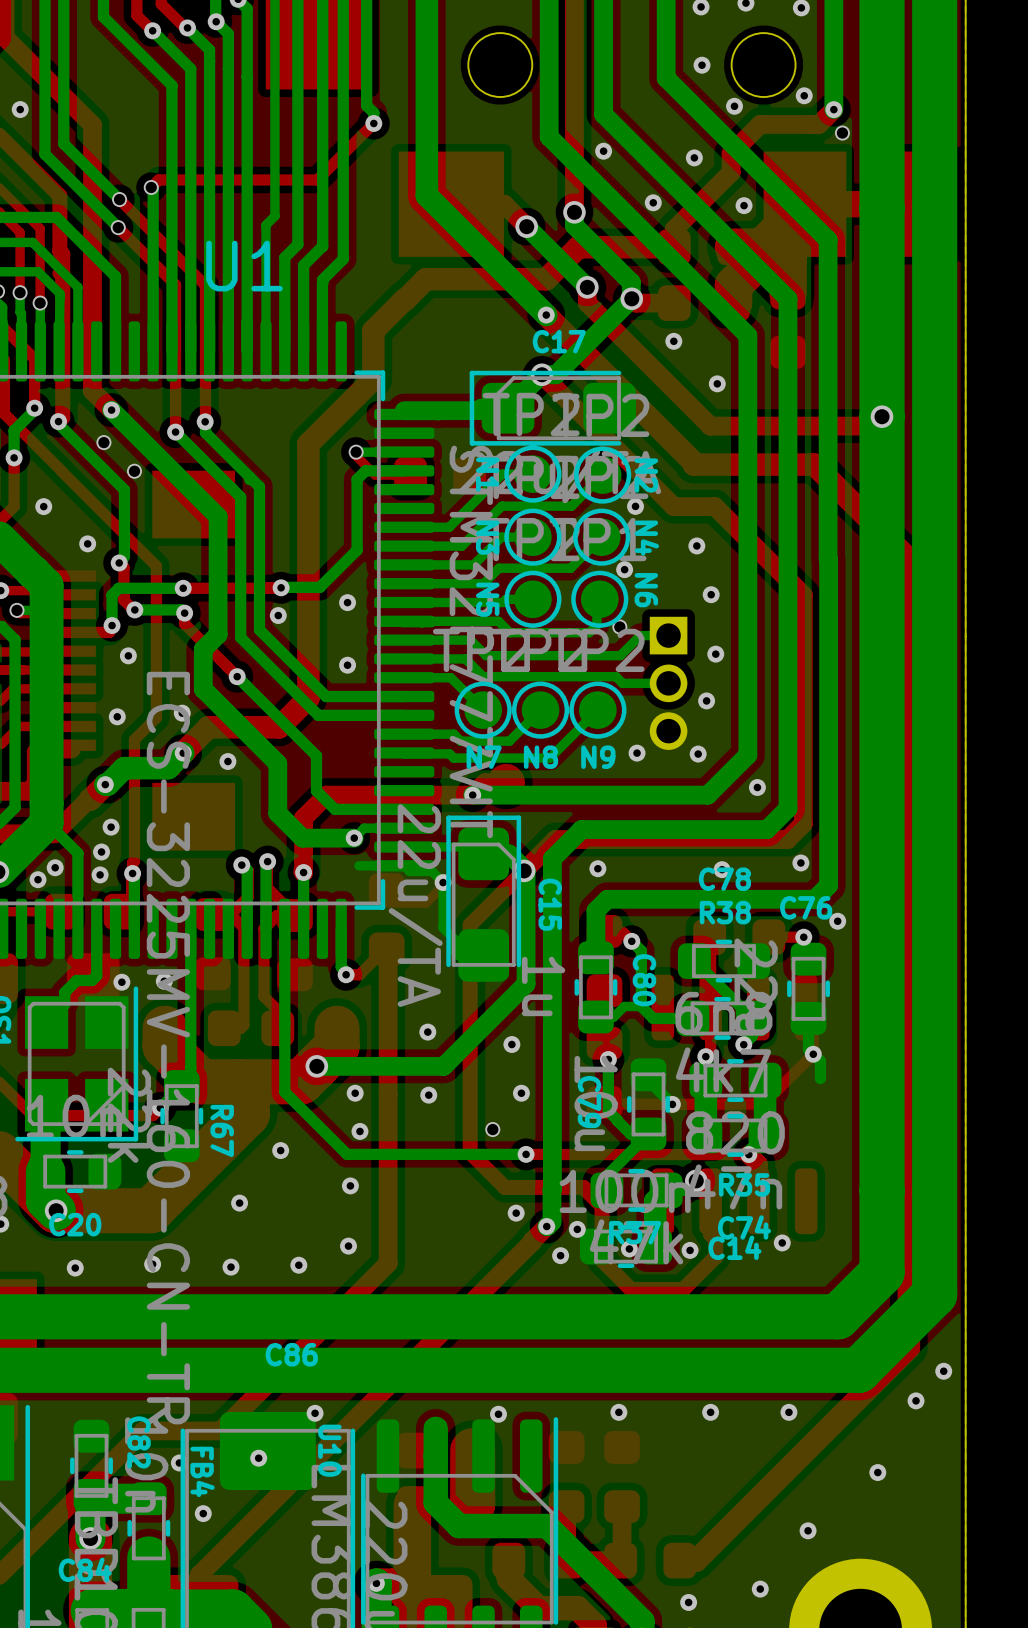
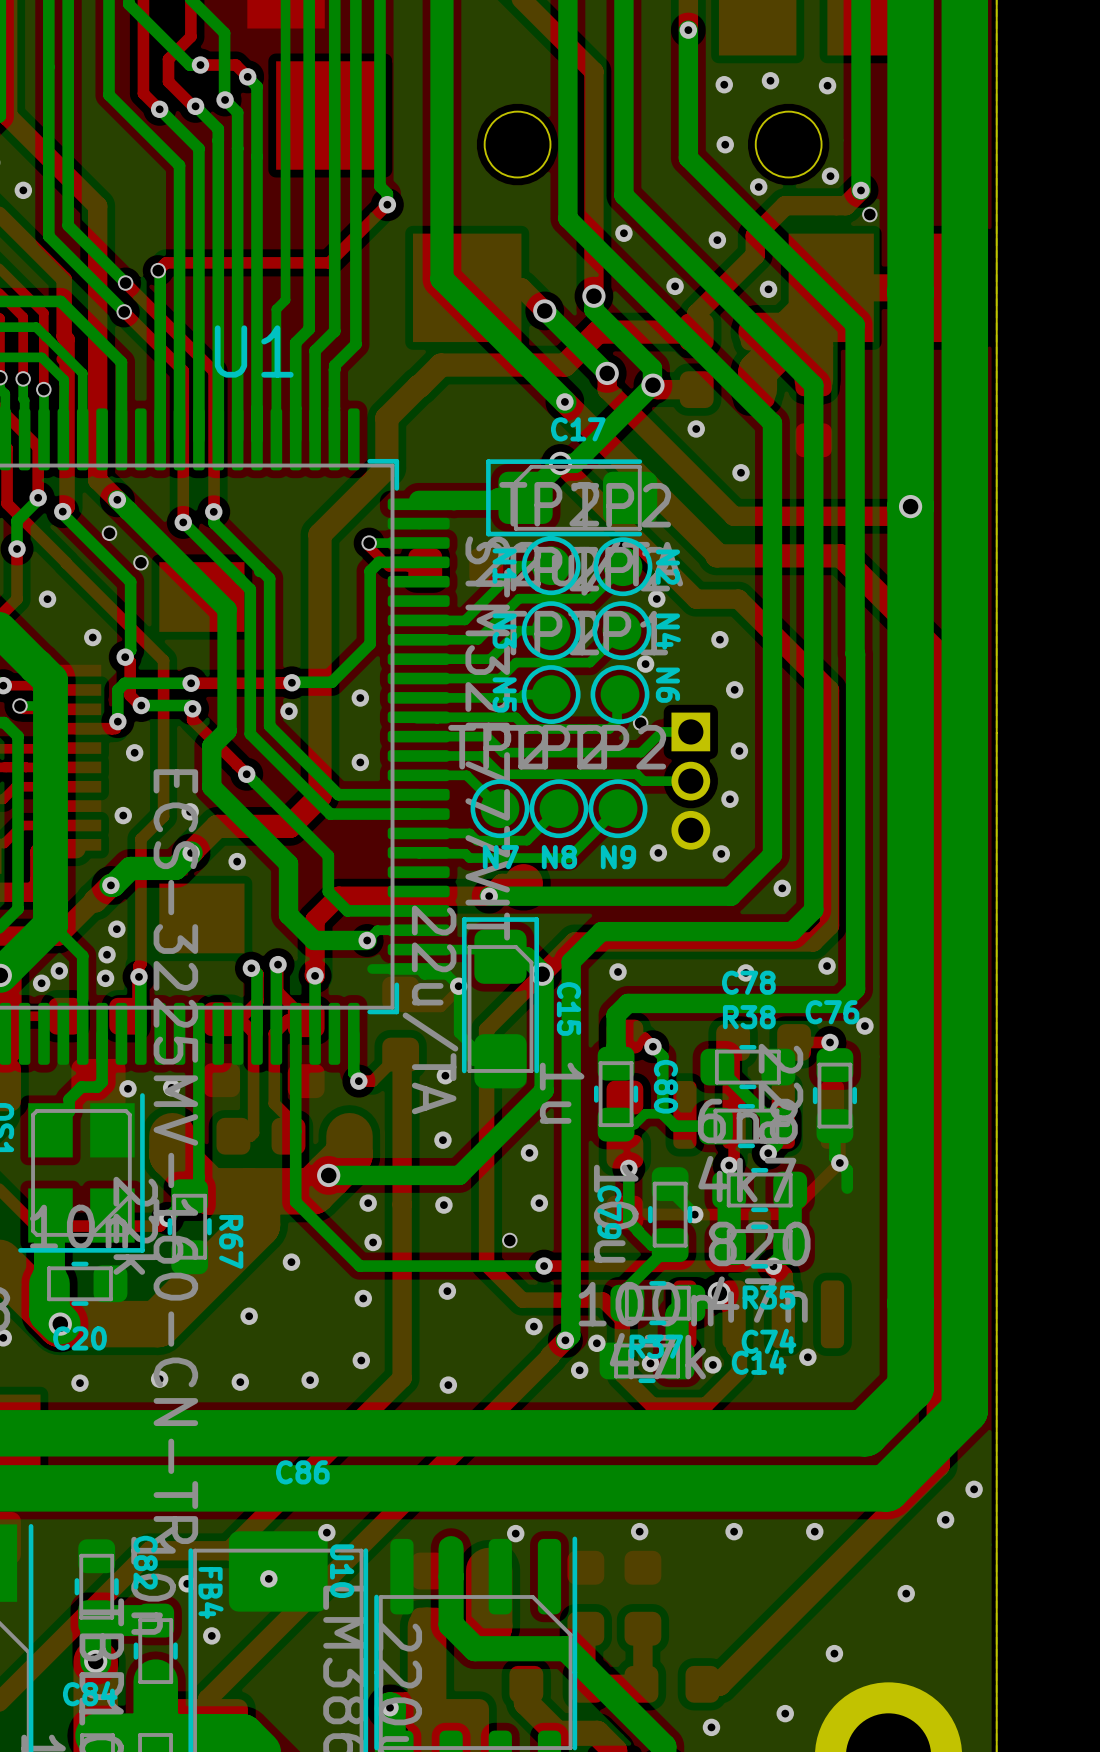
via: none -> (445, 1075)
via: none -> (447, 1291)
via: none -> (448, 1385)

